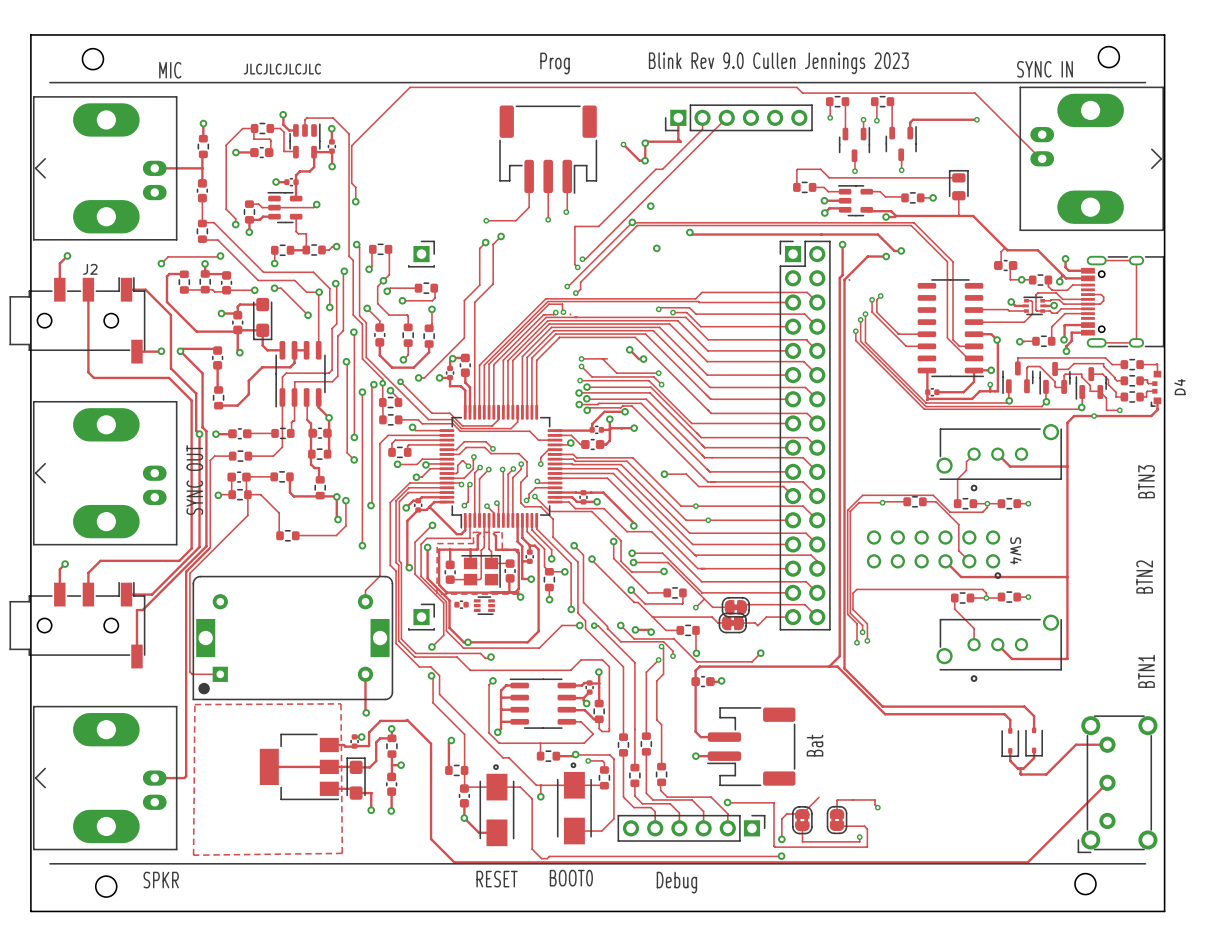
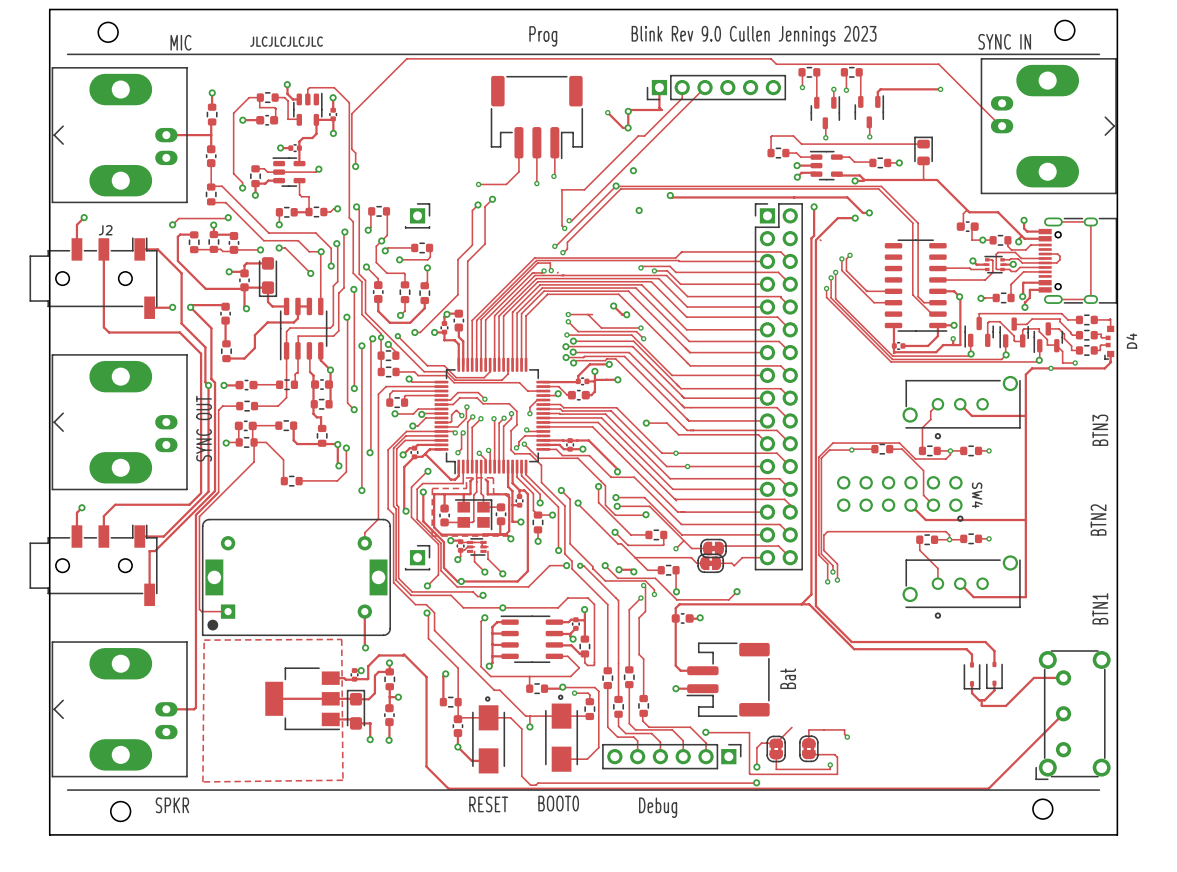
track: none -> (450, 540) (481, 542) (483, 546) (487, 546)
via: none -> (450, 540)
part rotation: 0° (461, 604) -> 90° clockwise (460, 546)
track: none -> (474, 546) (467, 546) (464, 550) (460, 550) (460, 556) (457, 559)
track: none -> (474, 551) (474, 561) (484, 572)
track: none -> (487, 551) (487, 559) (502, 573)
via: none -> (457, 559)
via: none -> (484, 572)
via: none -> (502, 573)
via: none -> (502, 607)

